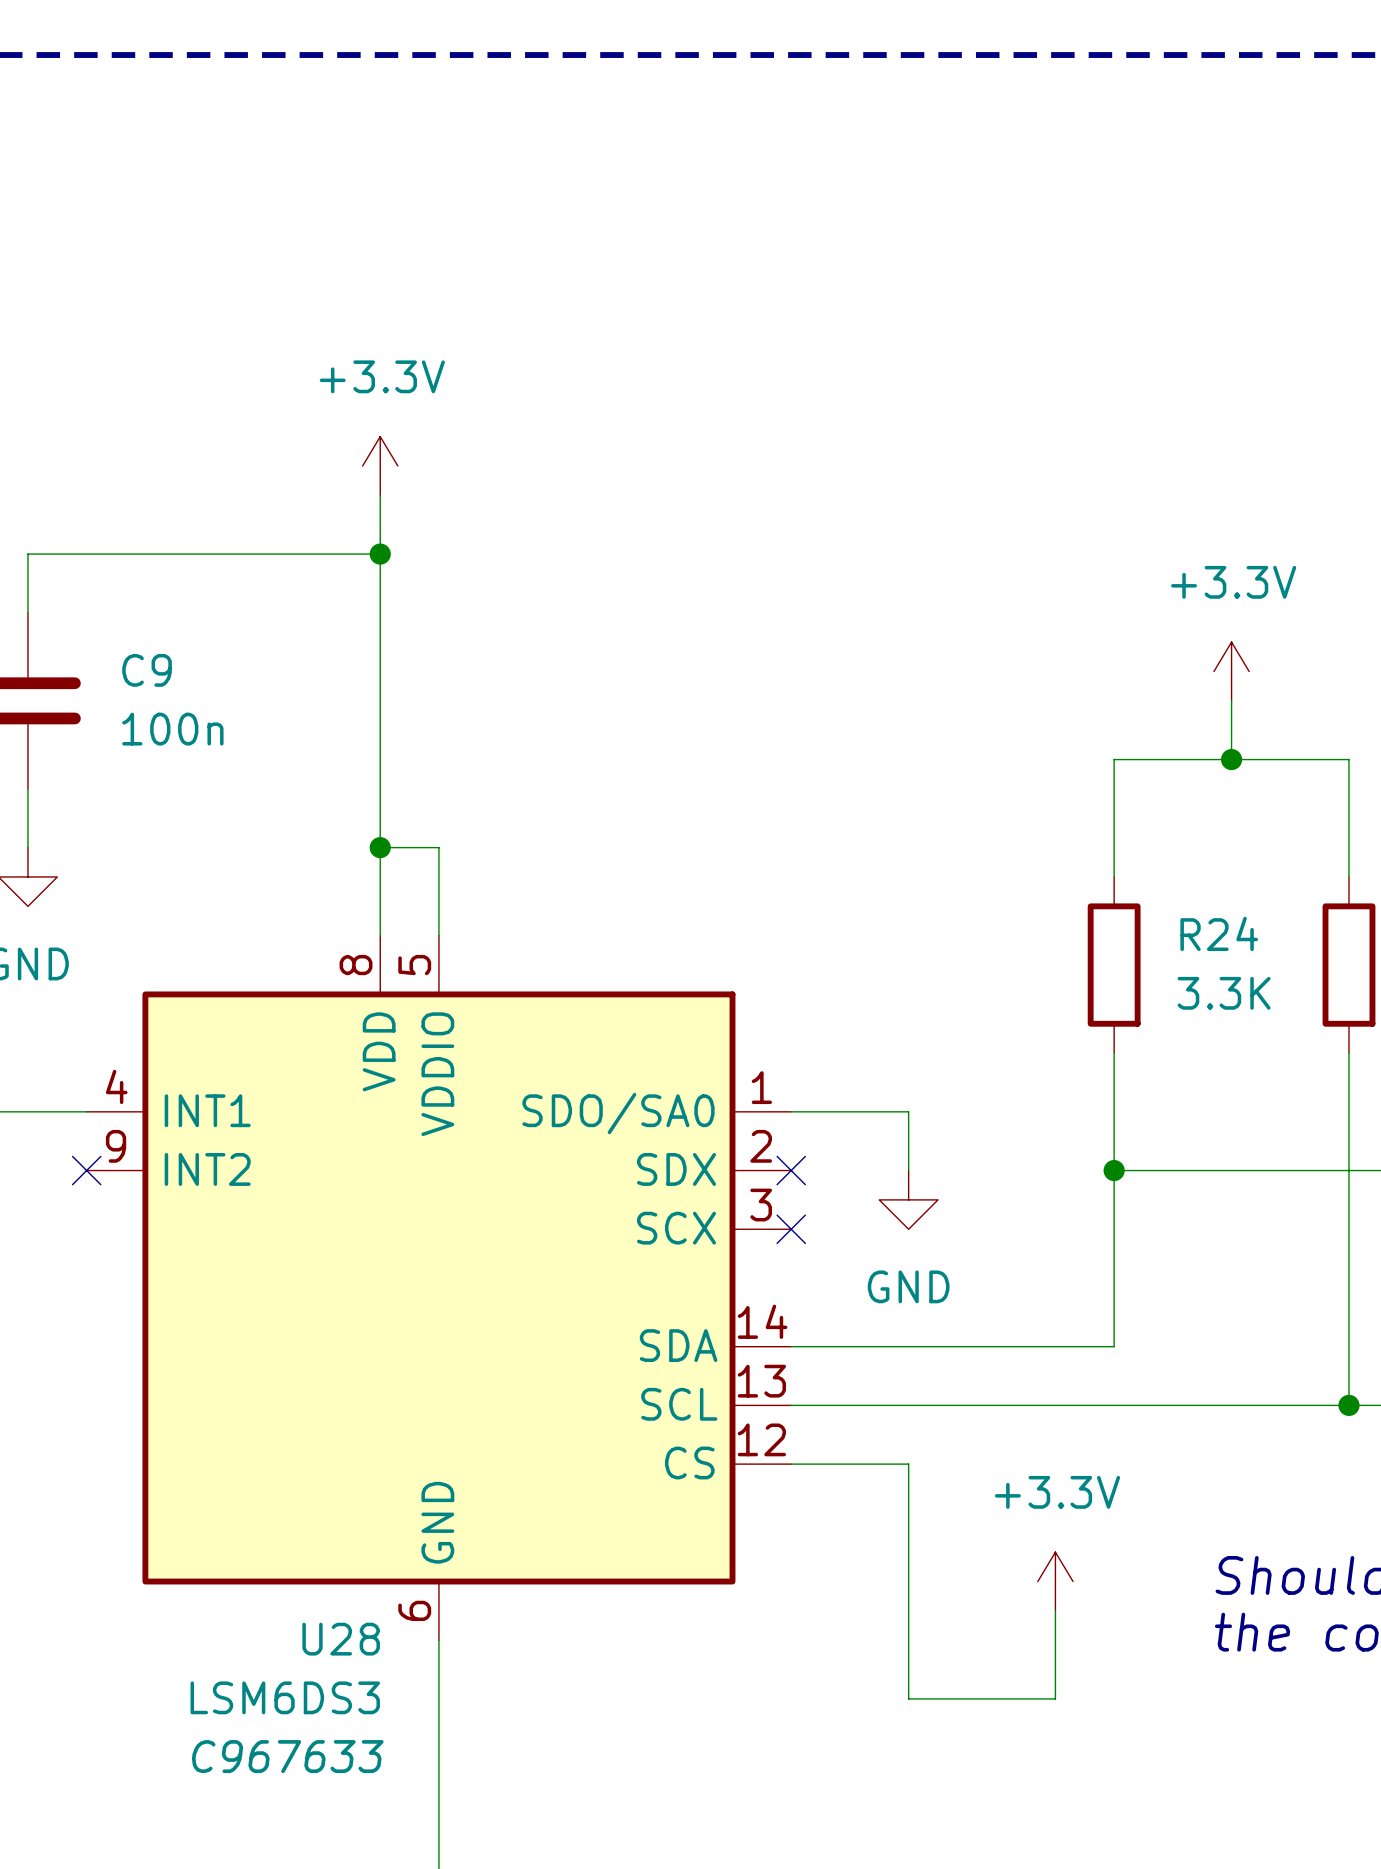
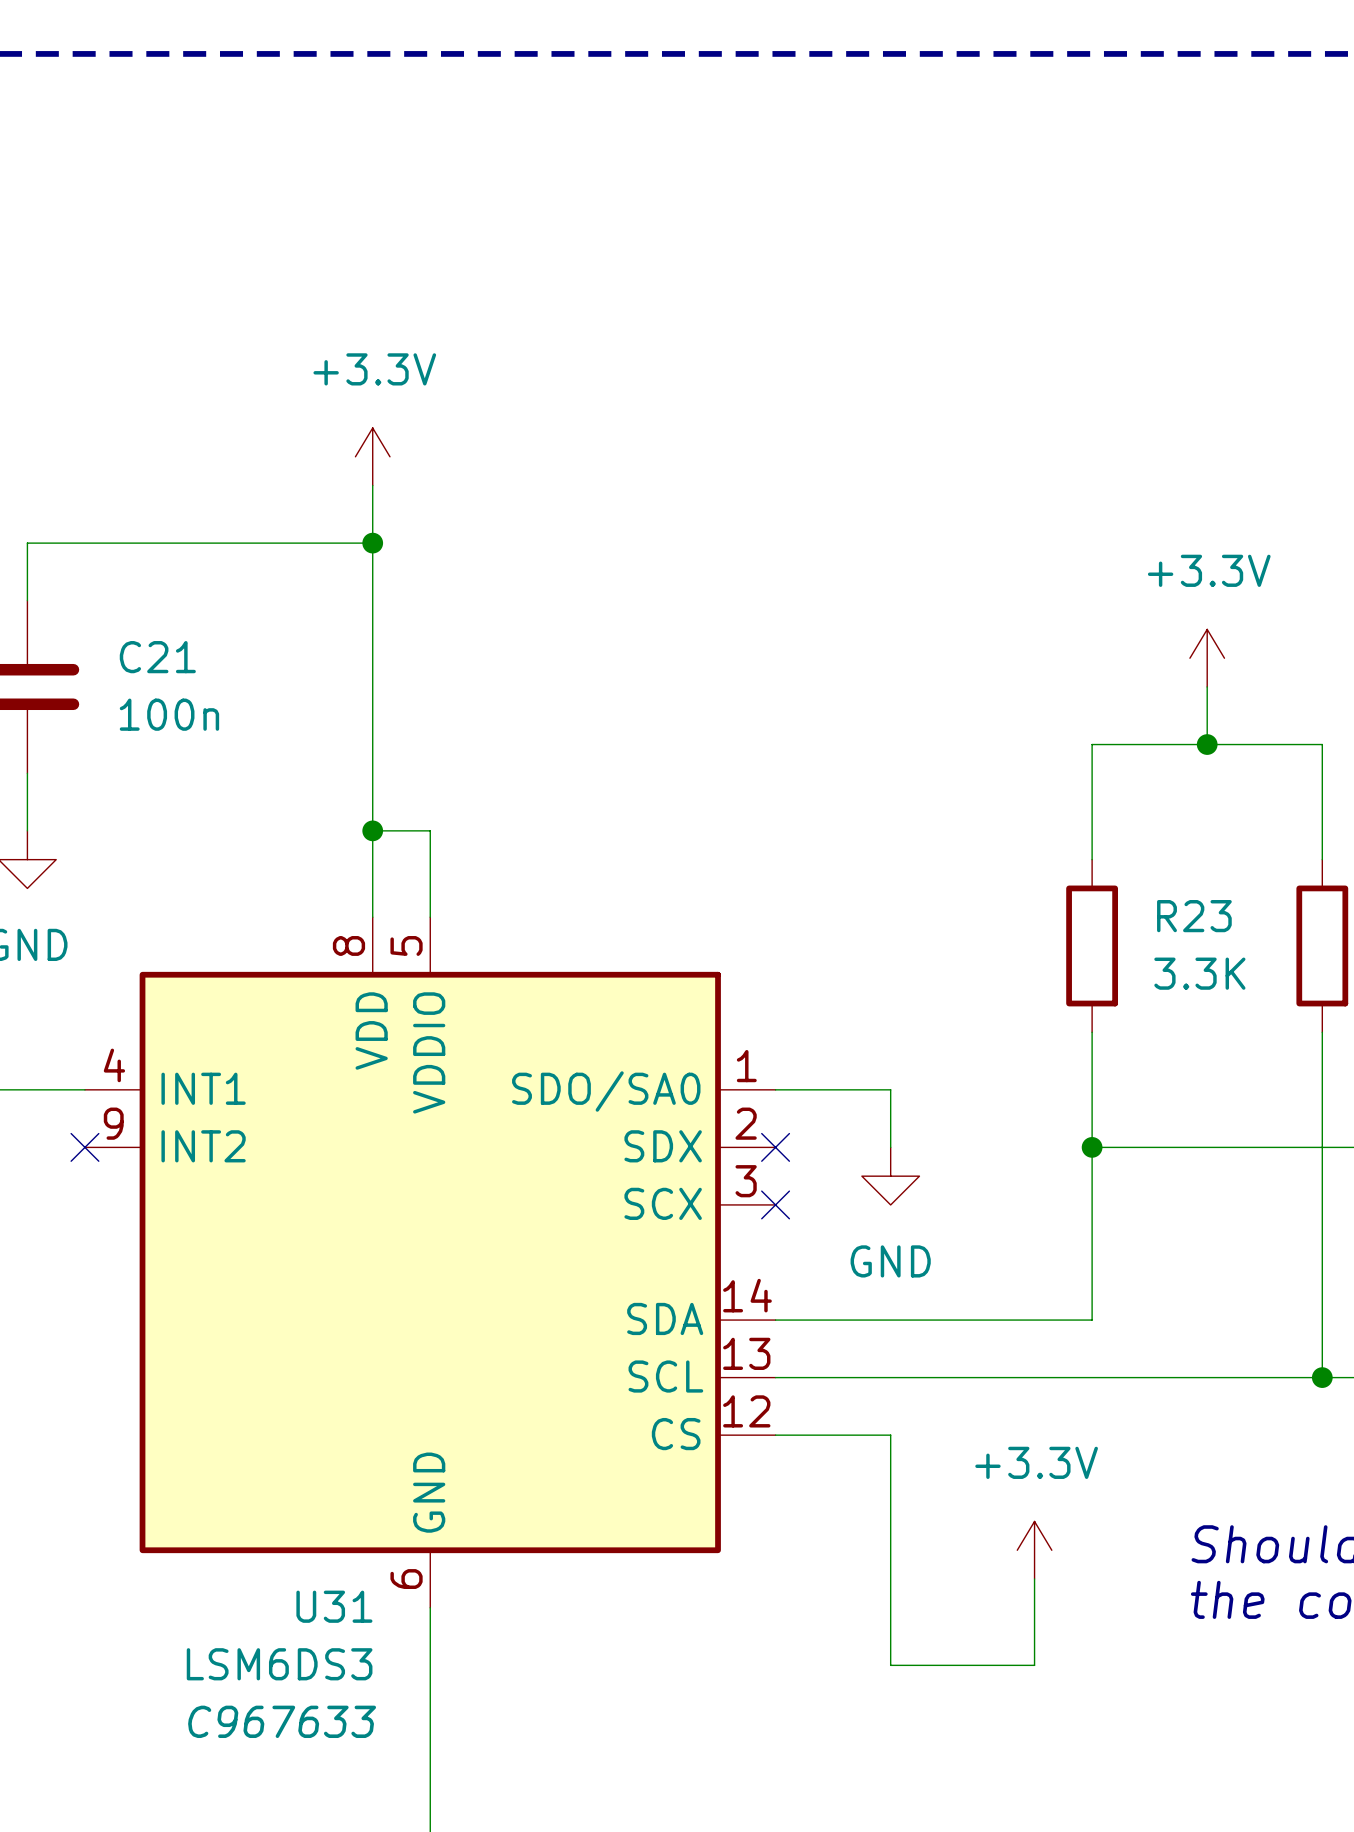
C9 name: C9 (147, 670) -> C21 (157, 657)
R24 name: R24 (1219, 933) -> R23 (1194, 916)
U28 name: U28 (341, 1639) -> U31 (334, 1606)

